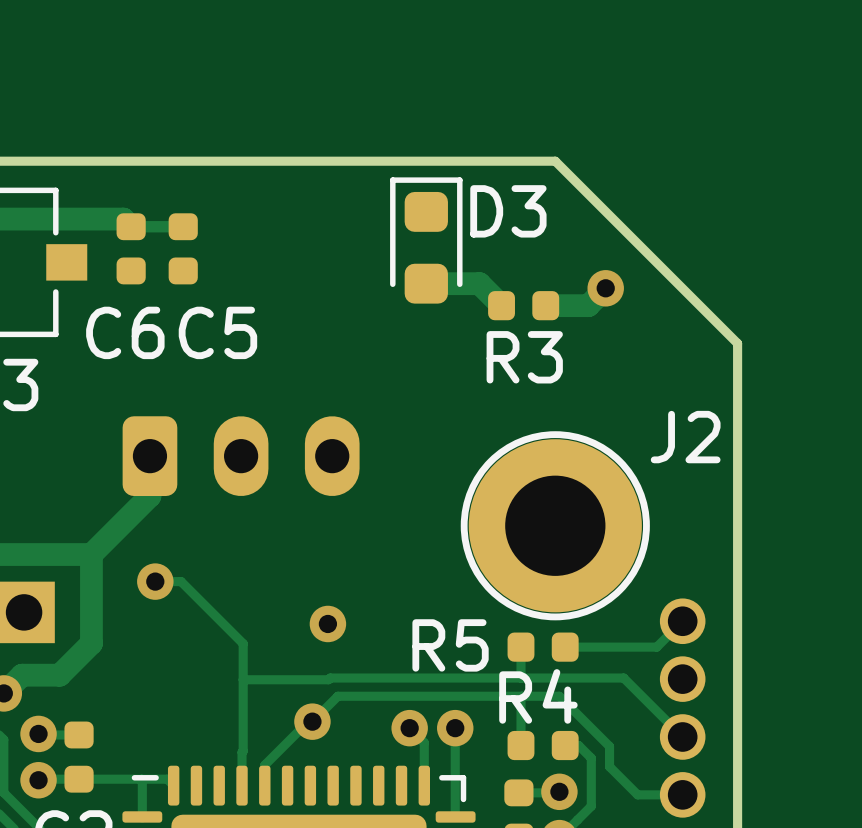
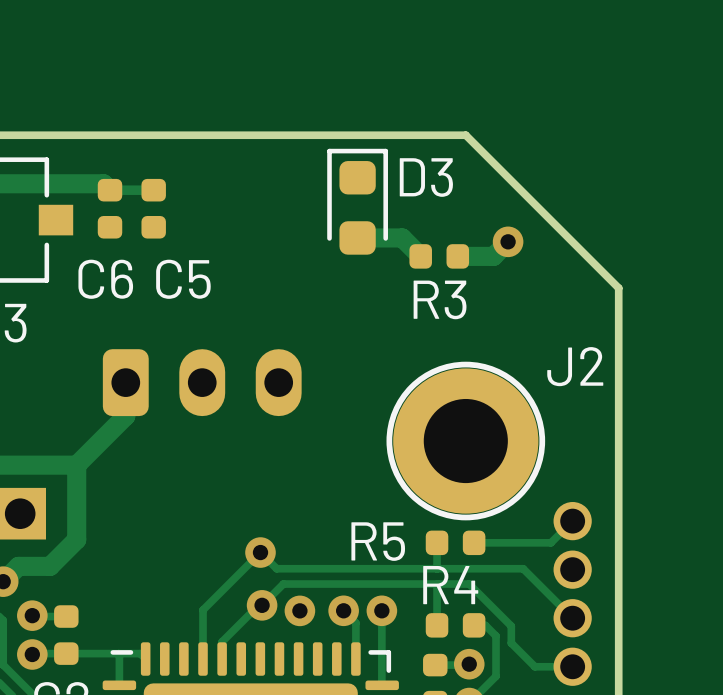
track: (155, 581) (181, 581) (243, 643) (242, 752) -> none
via: (155, 581) -> none
via position: (327, 623) -> (260, 552)
track: (330, 678) (328, 679) (243, 679) -> (276, 568) (260, 552) (203, 610) (203, 631)
via: none -> (299, 610)

